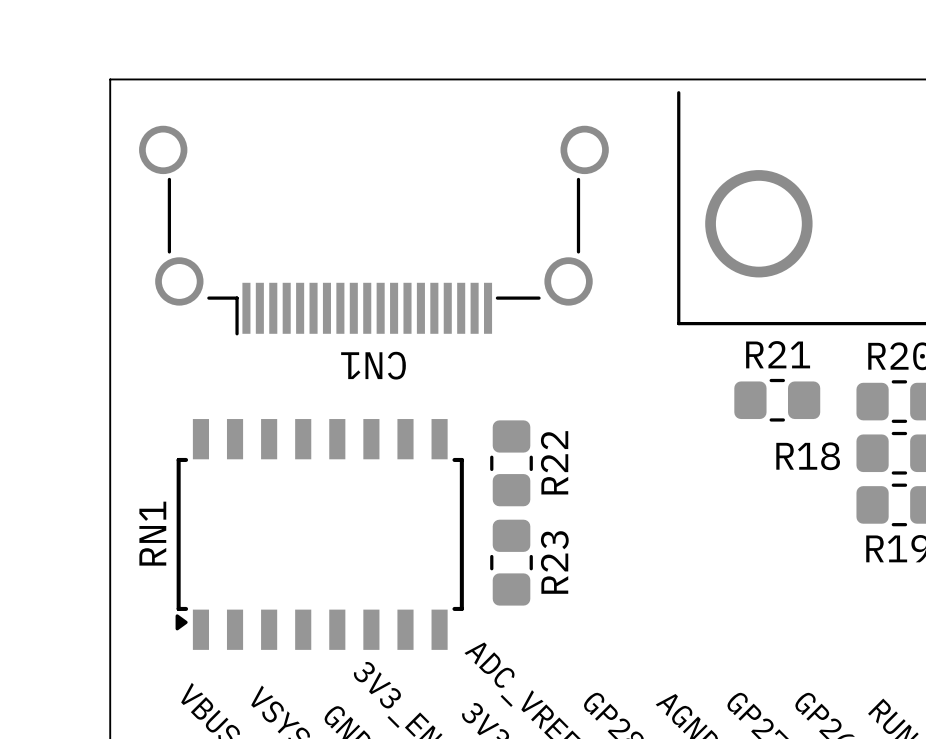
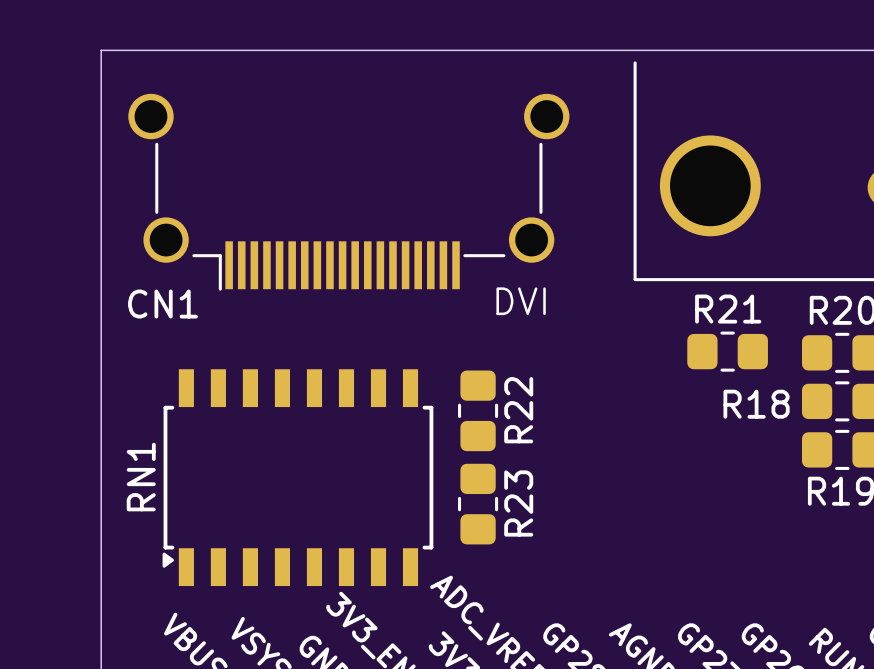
text: none -> DVI (521, 301)
CN1 name rotation: 0° (373, 365) -> 180° (162, 304)
CN1 name position: CN1 (373, 365) -> CN1 (162, 304)

